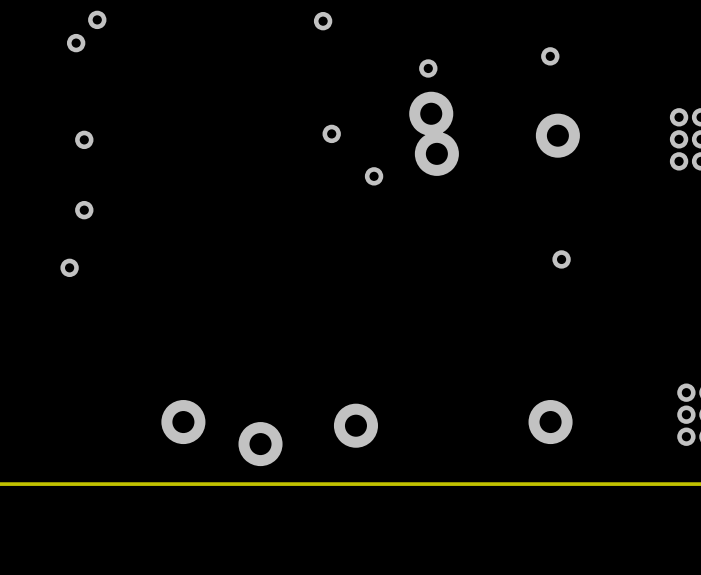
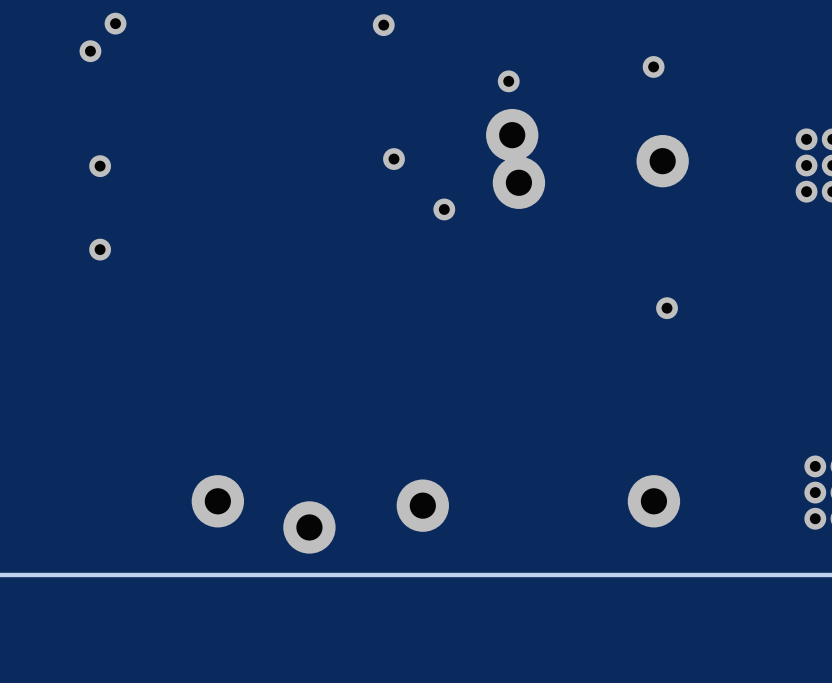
via: (69, 267) -> none

